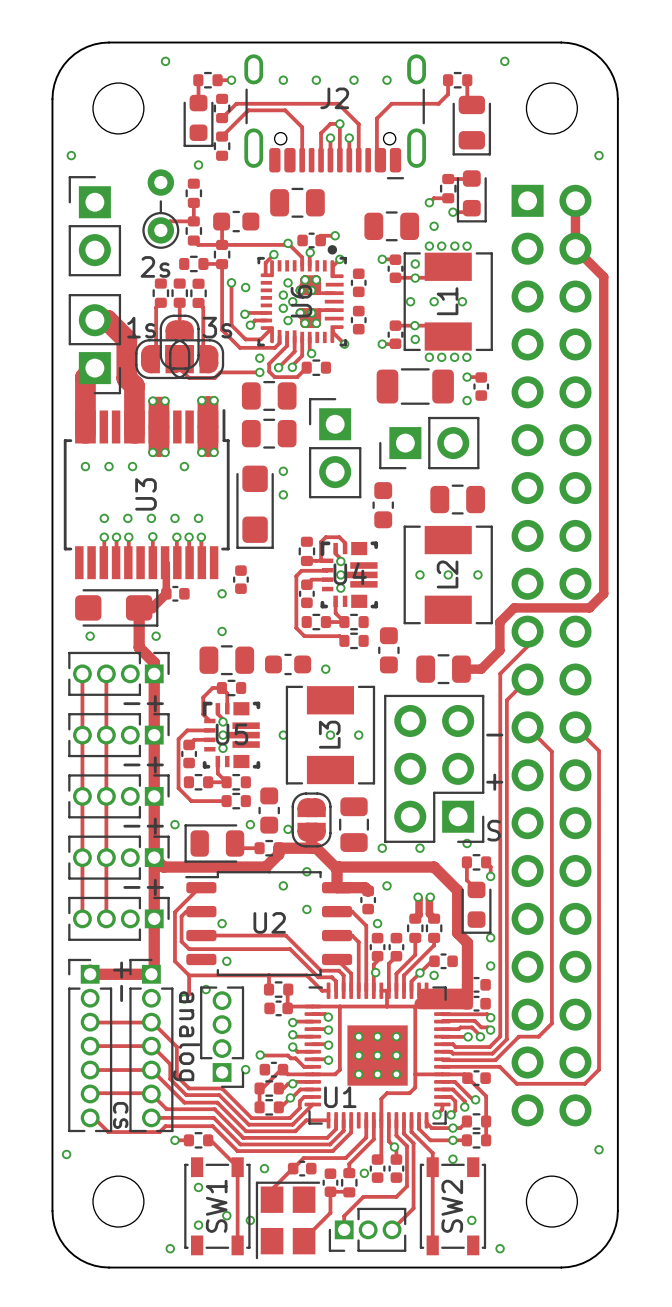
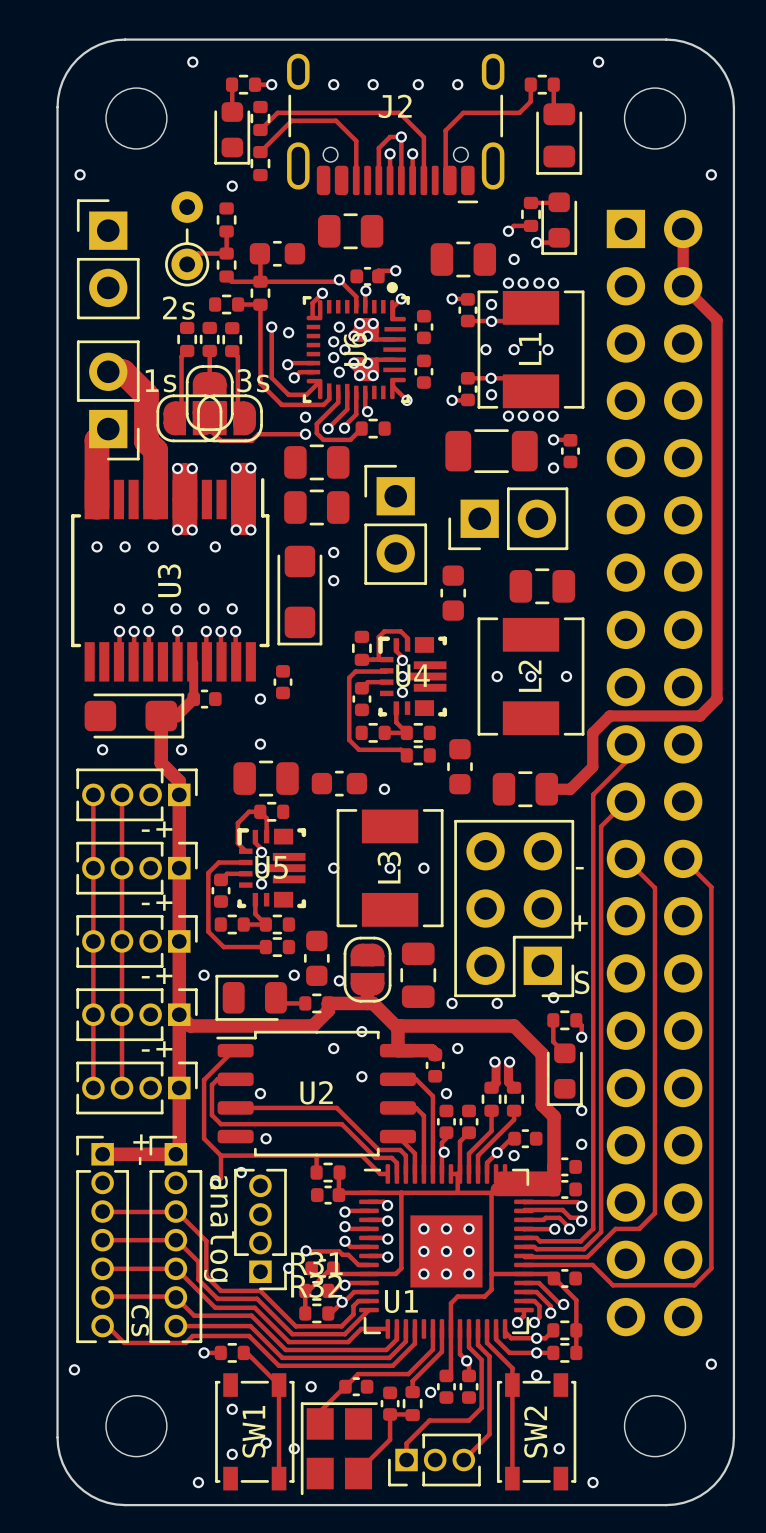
R31 name: none -> R31 (316, 1263)
R32 name: none -> R32 (316, 1286)

